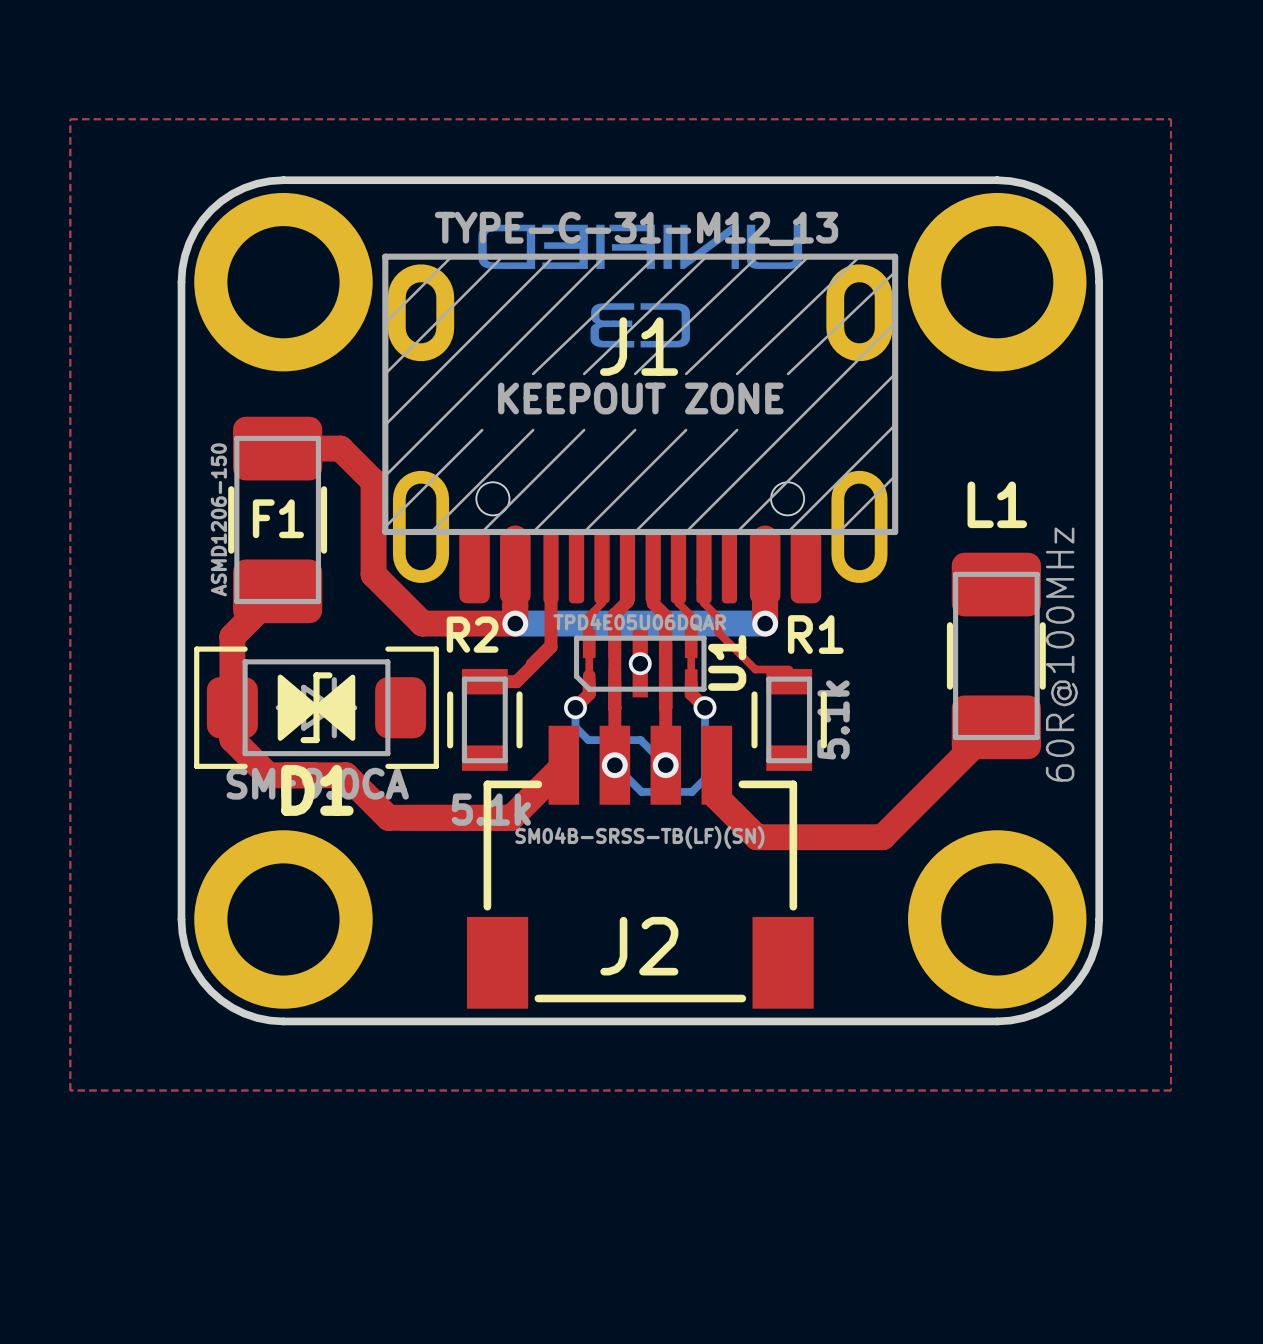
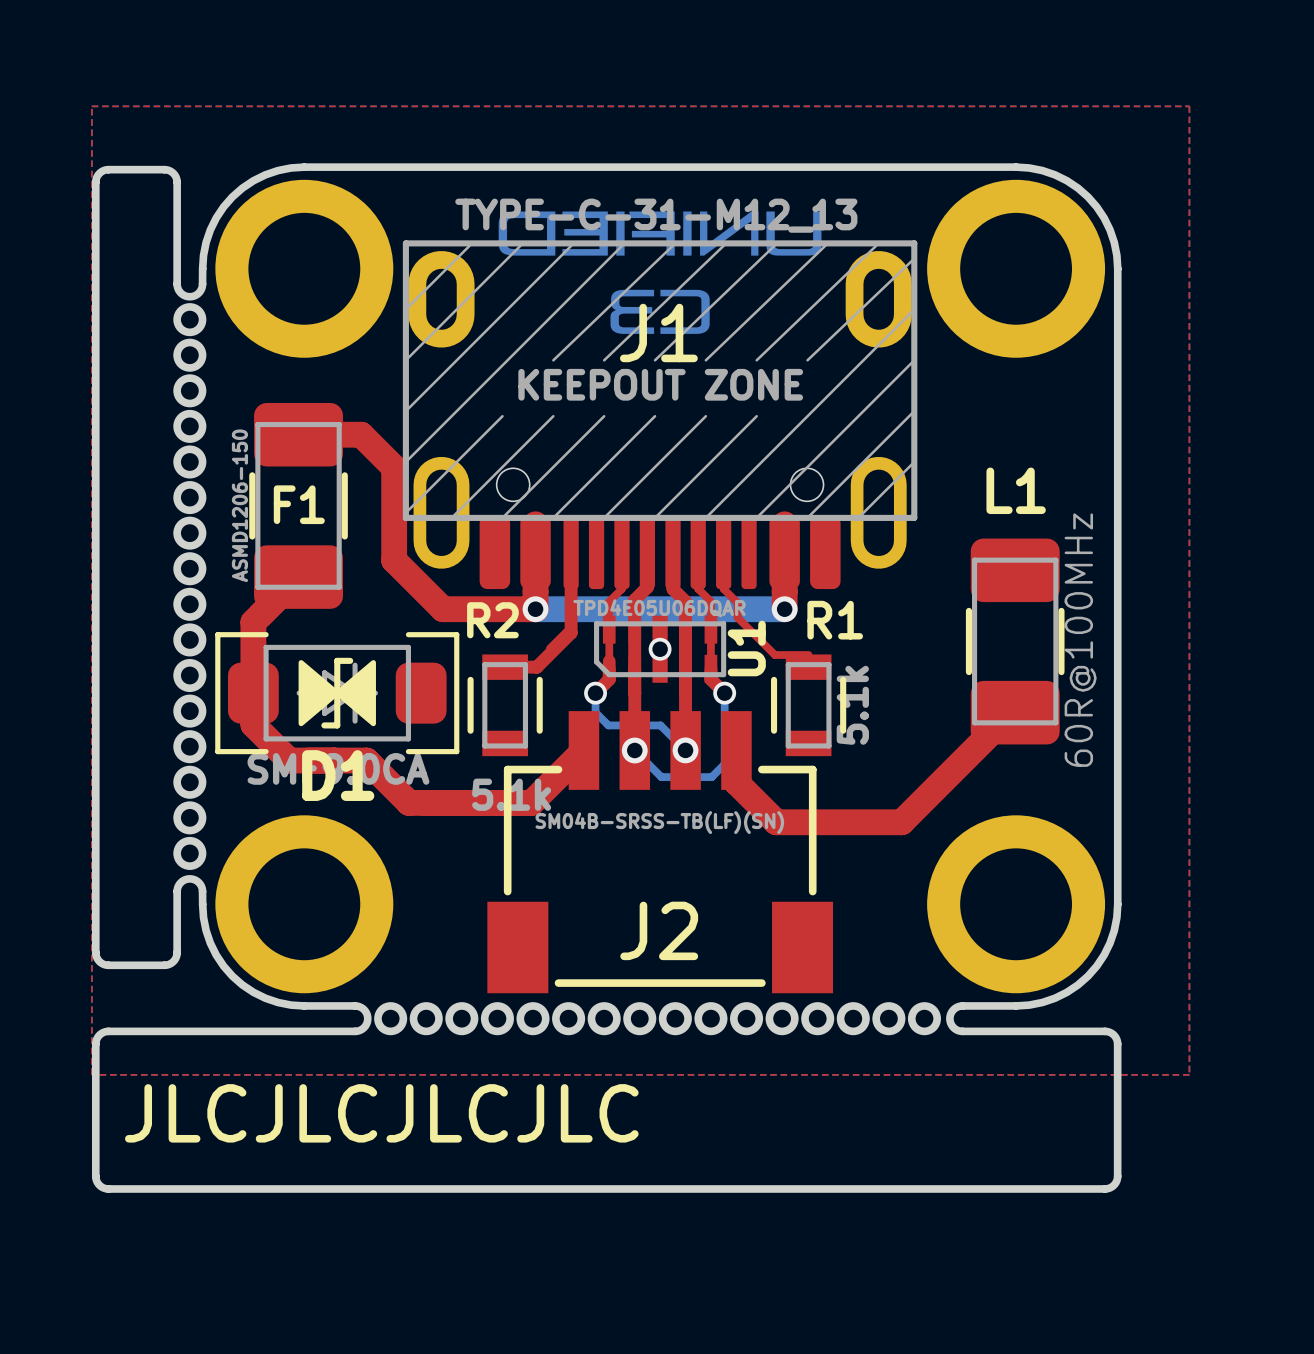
board edge: (181, 282) (181, 919) -> (202, 268) (202, 285) (199, 291) (191, 296) (182, 294) (177, 285) (177, 182) (173, 173) (164, 169) (108, 169) (99, 173) (95, 182) (95, 952) (97, 958) (102, 963) (108, 965) (164, 965) (170, 963) (177, 954) (177, 891) (180, 882) (189, 878) (198, 882) (202, 889) (202, 904)
round board edge: none -> [173, 303, 207, 337]
round board edge: none -> [173, 338, 207, 372]
round board edge: none -> [173, 374, 207, 408]
round board edge: none -> [173, 409, 207, 443]
round board edge: none -> [173, 445, 207, 479]
round board edge: none -> [173, 481, 207, 515]
round board edge: none -> [173, 516, 207, 550]
round board edge: none -> [173, 552, 207, 586]
round board edge: none -> [173, 587, 207, 621]
round board edge: none -> [173, 623, 207, 657]
round board edge: none -> [173, 658, 207, 693]
round board edge: none -> [173, 694, 207, 728]
round board edge: none -> [173, 730, 207, 764]
round board edge: none -> [173, 765, 207, 799]
round board edge: none -> [173, 801, 207, 835]
round board edge: none -> [173, 836, 207, 870]
round board edge: none -> [374, 1002, 408, 1036]
round board edge: none -> [409, 1002, 443, 1036]
round board edge: none -> [445, 1002, 479, 1036]
round board edge: none -> [480, 1002, 514, 1036]
round board edge: none -> [516, 1002, 550, 1036]
round board edge: none -> [552, 1002, 586, 1036]
round board edge: none -> [587, 1002, 621, 1036]
round board edge: none -> [623, 1002, 657, 1036]
round board edge: none -> [658, 1002, 692, 1036]
round board edge: none -> [694, 1002, 728, 1036]
round board edge: none -> [730, 1002, 764, 1036]
round board edge: none -> [765, 1002, 799, 1036]
round board edge: none -> [801, 1002, 835, 1036]
round board edge: none -> [836, 1002, 870, 1036]
round board edge: none -> [872, 1002, 906, 1036]
round board edge: none -> [907, 1002, 941, 1036]
board edge: (334, 1021) (943, 1021) -> (355, 1005) (364, 1009) (367, 1018) (364, 1027) (356, 1031) (108, 1031) (100, 1034) (95, 1044) (95, 1176) (98, 1184) (108, 1188) (1104, 1188) (1112, 1186) (1117, 1176) (1117, 1044) (1115, 1036) (1104, 1031) (959, 1030) (952, 1026) (949, 1017) (953, 1009) (962, 1005)
text: none -> JLCJLCJLCJLC (381, 1113)

